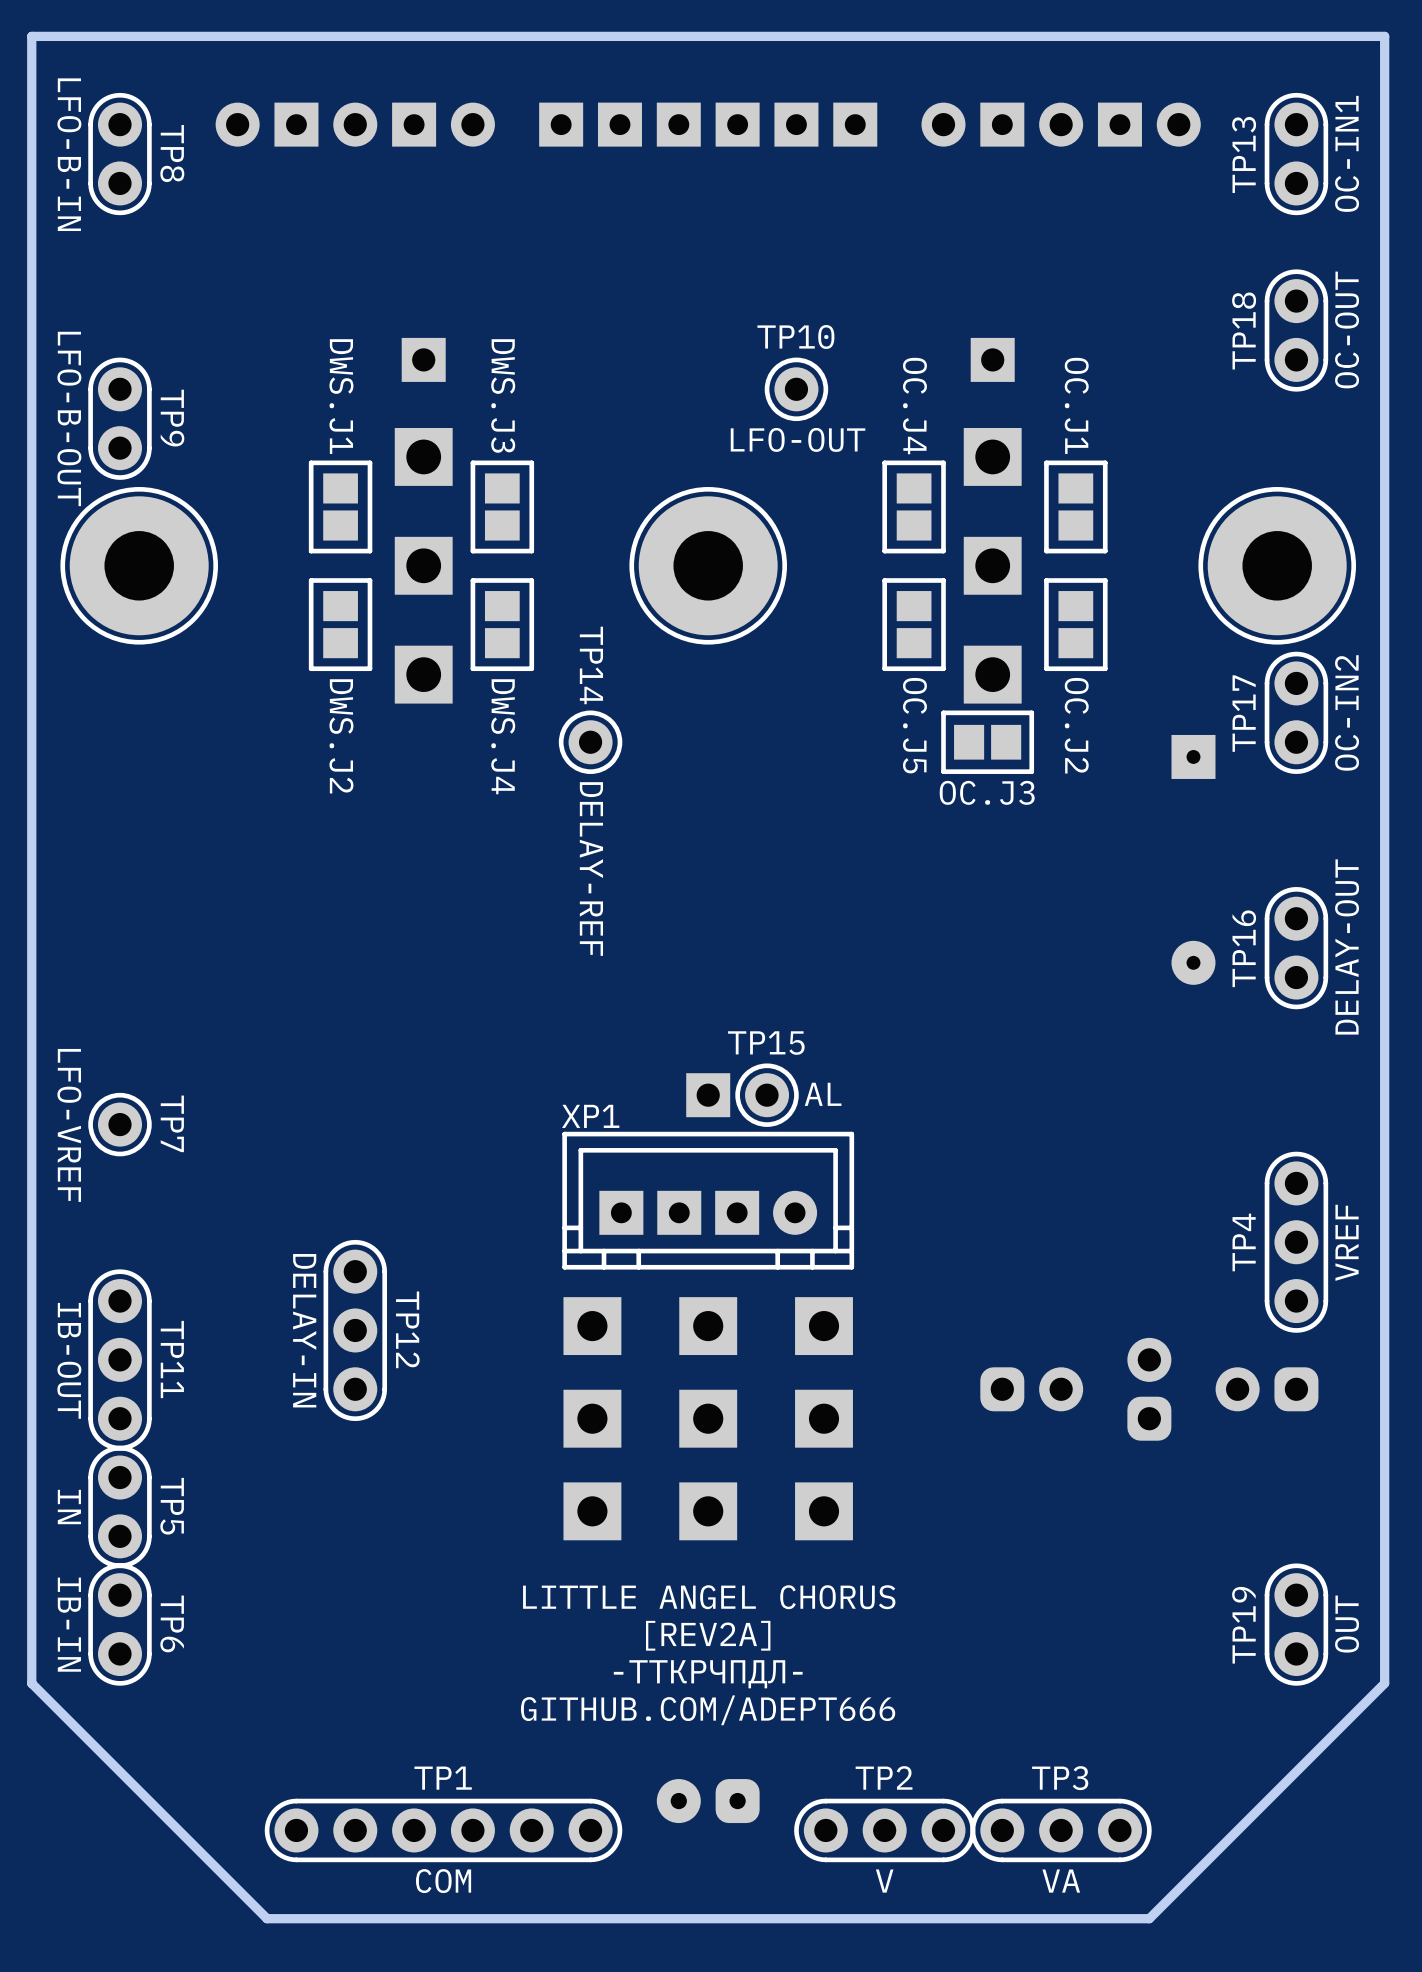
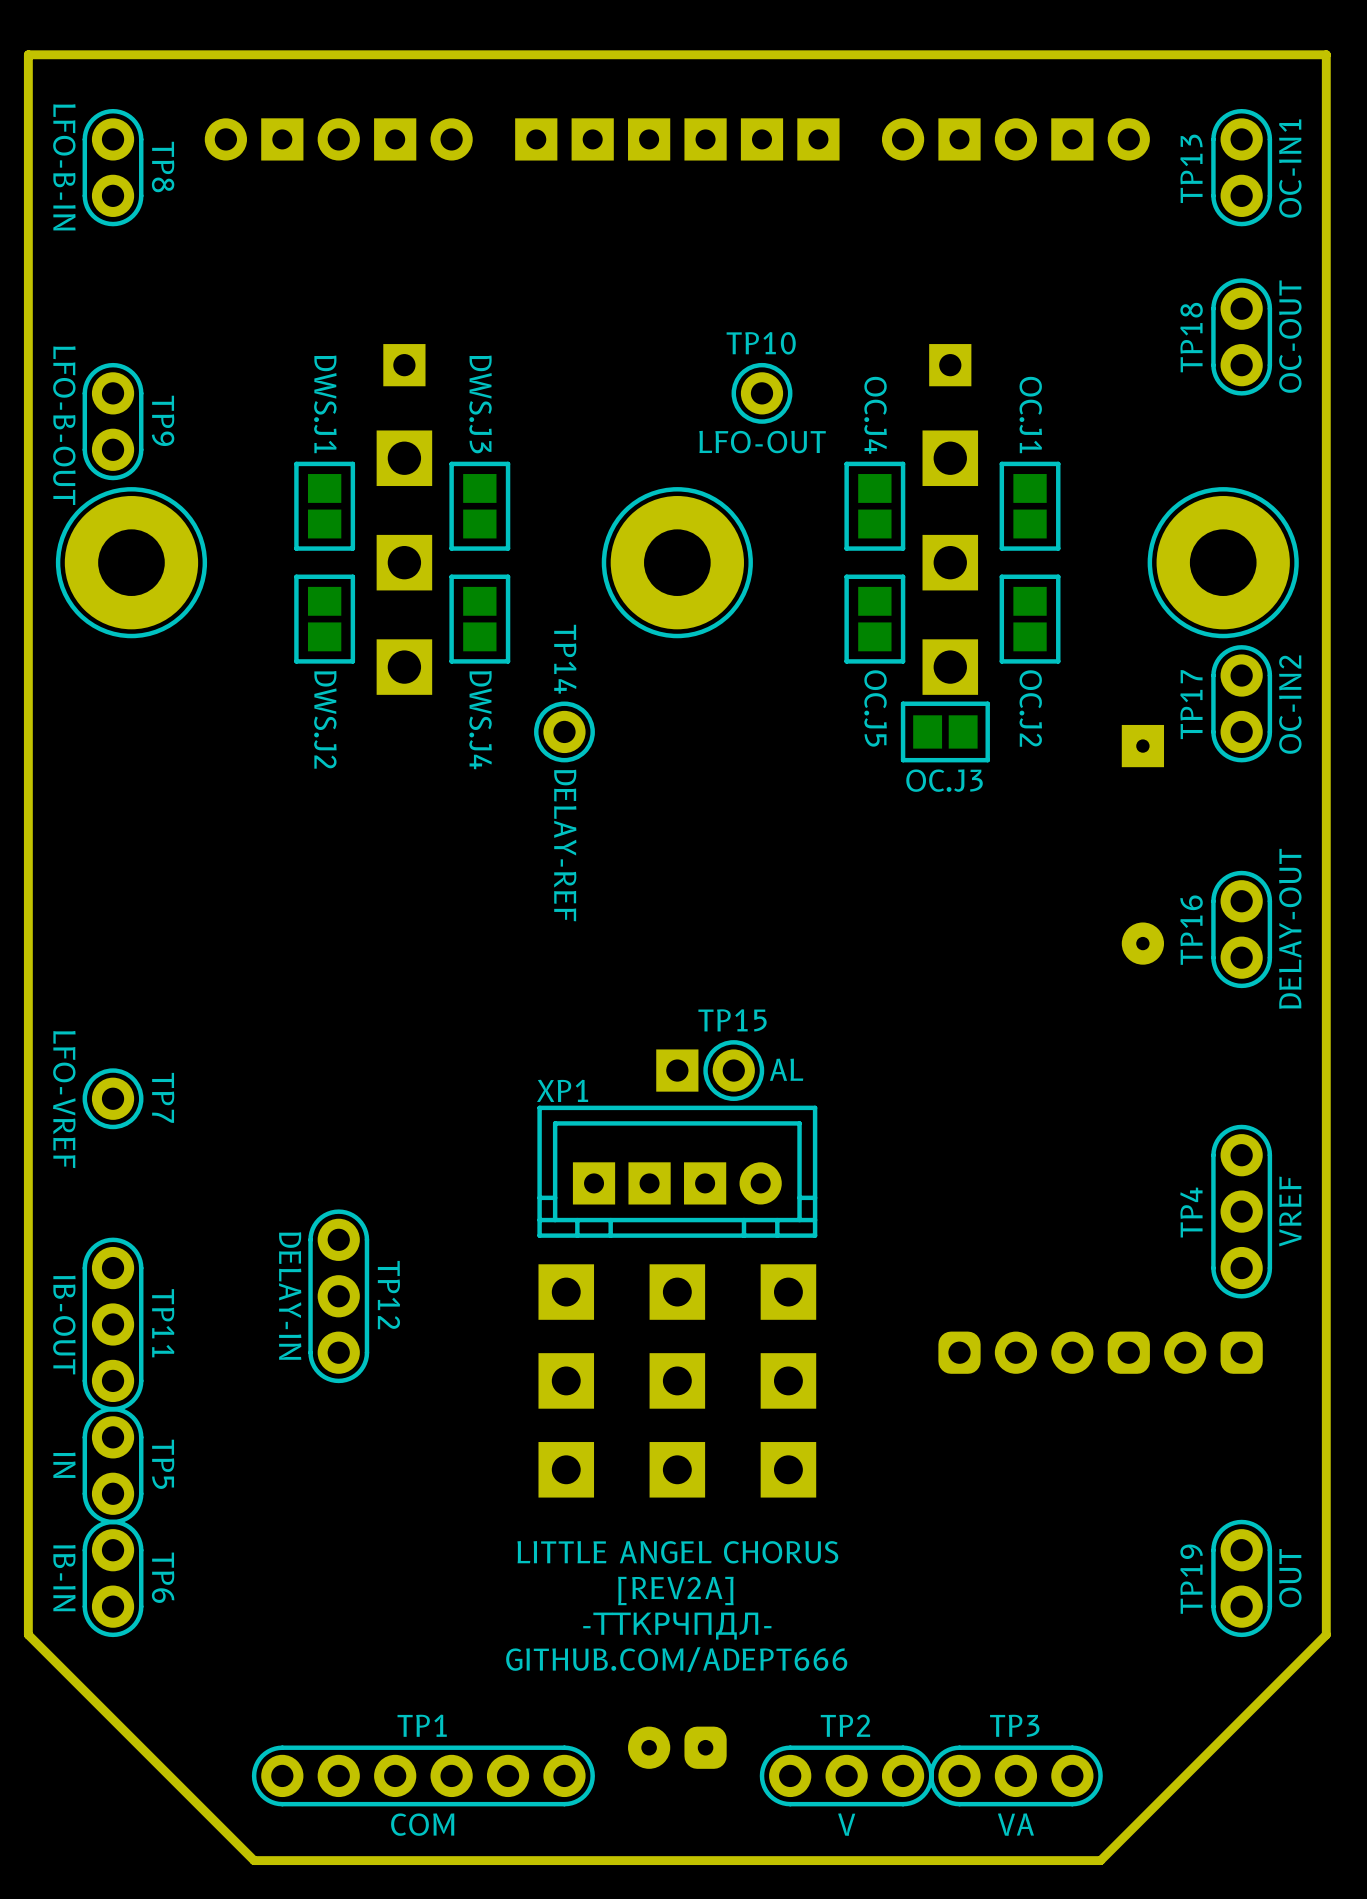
part rotation: 0° (1149, 1389) -> 90° counterclockwise (1100, 1352)

